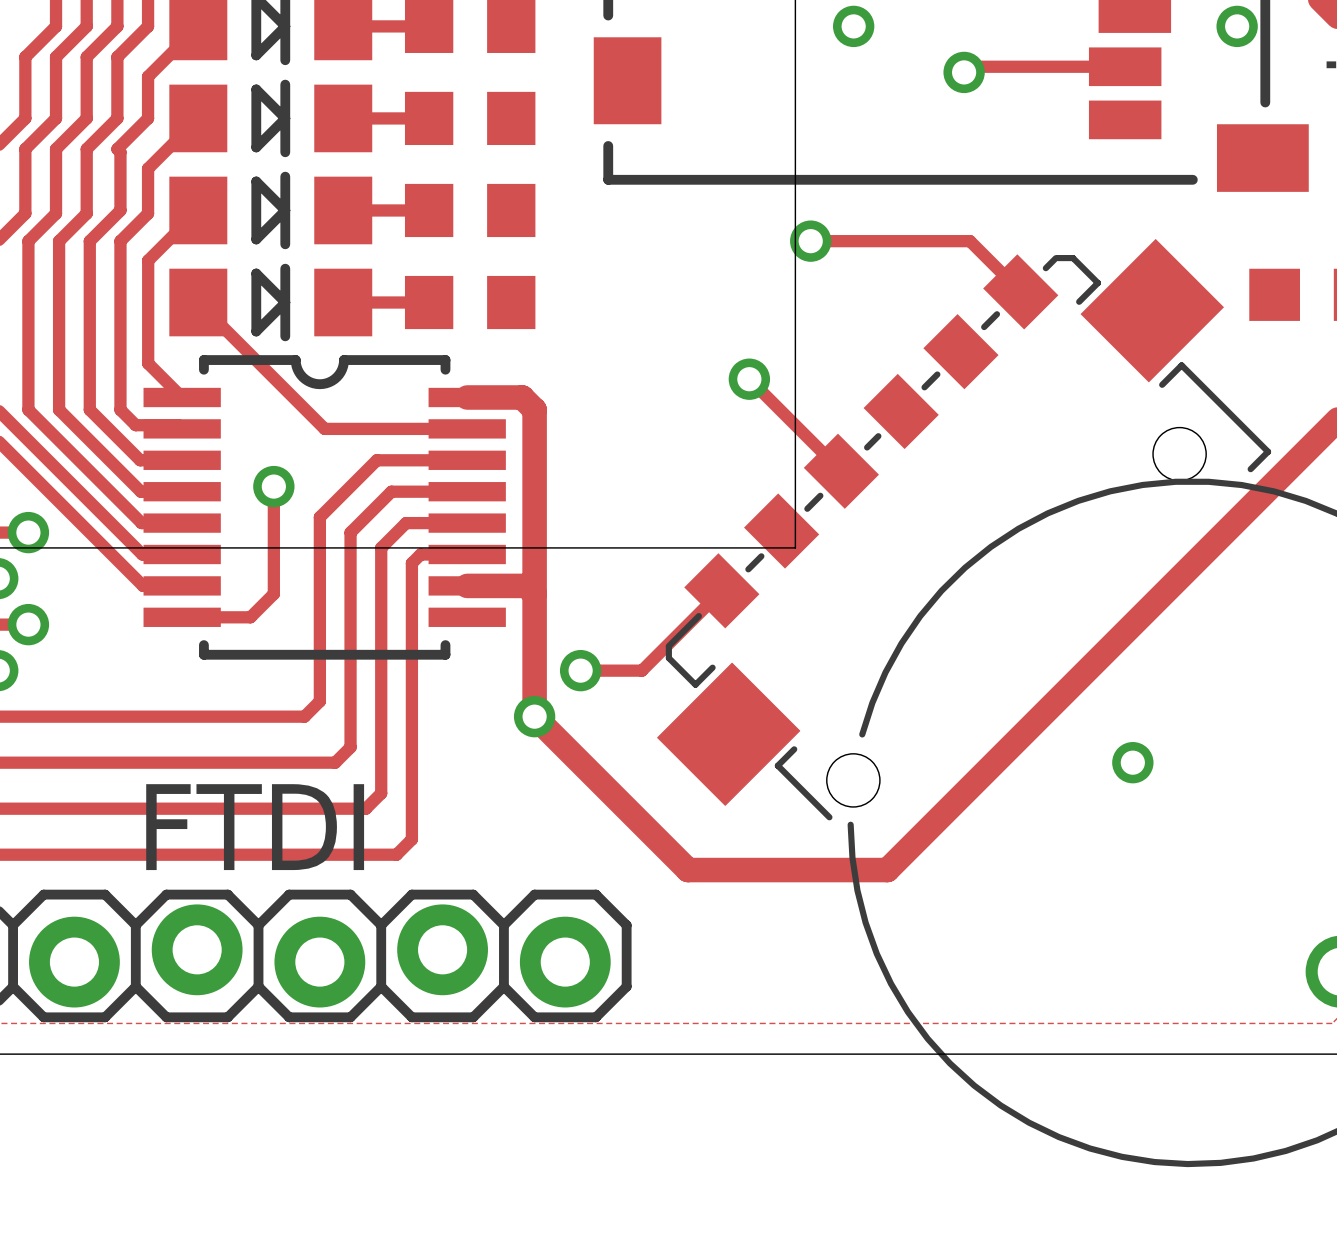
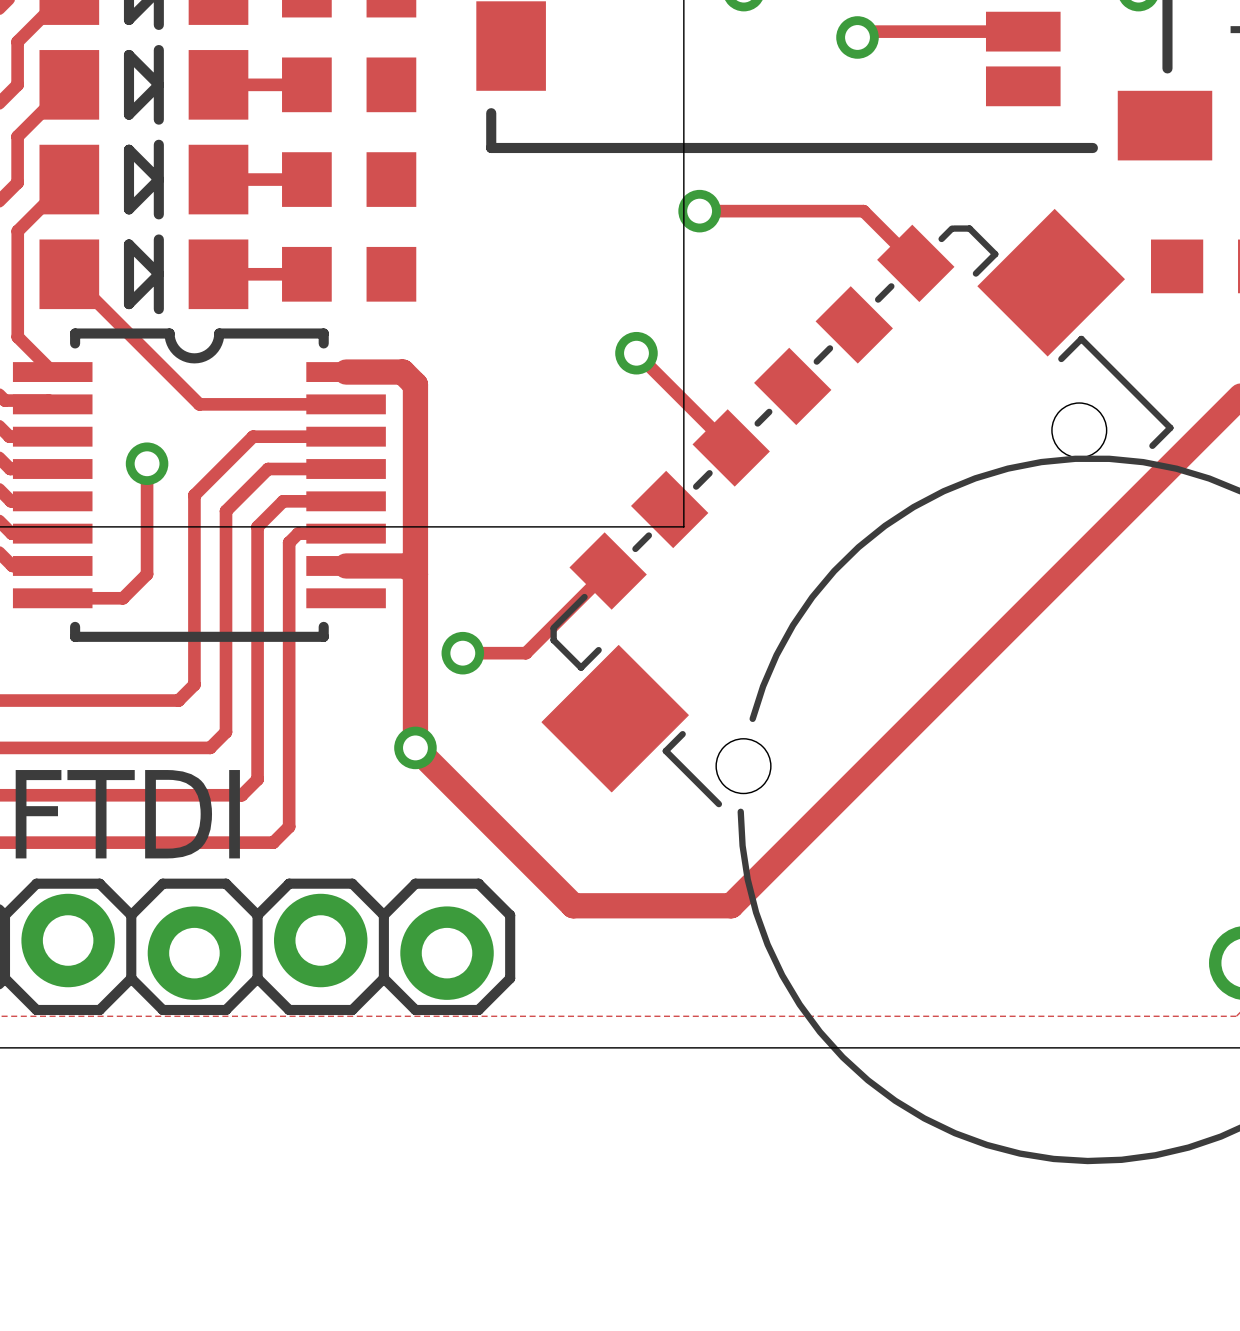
track: (534, 716) (688, 870) (887, 870) -> (415, 700) (415, 747) (573, 905) (731, 905) (778, 858)
via position: (534, 716) -> (415, 747)
via: (1132, 762) -> none

